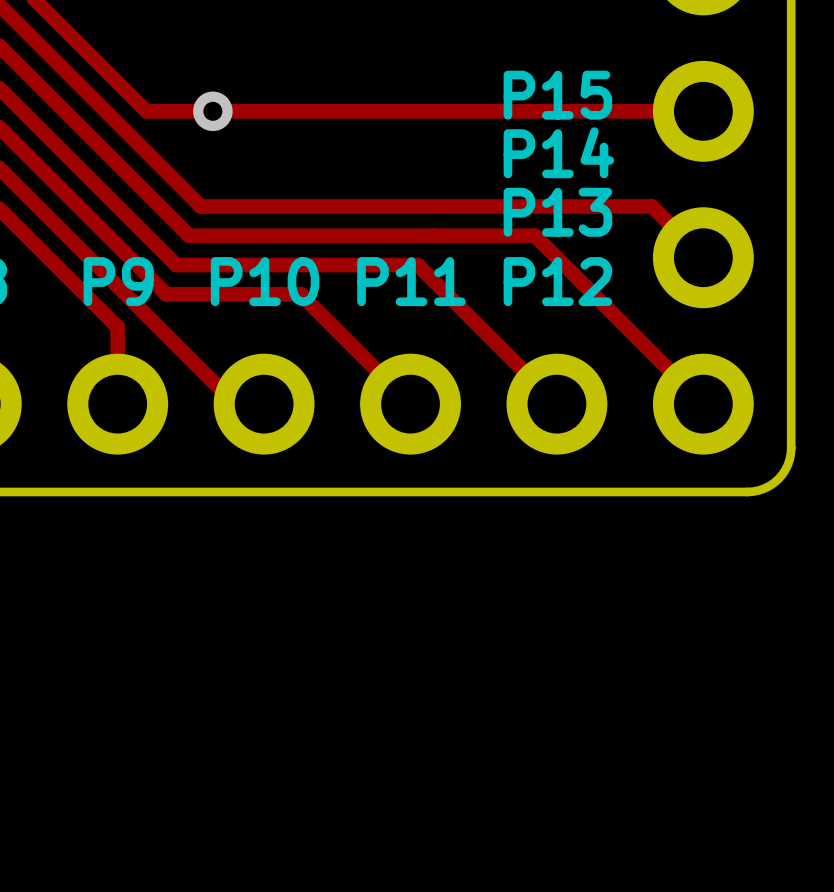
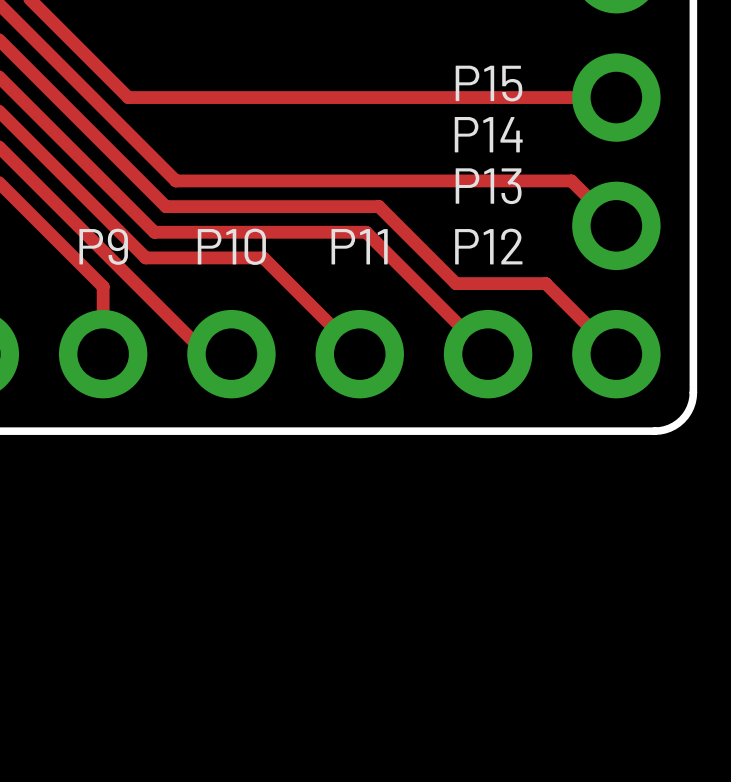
via: (212, 111) -> none
track: (432, 235) (534, 235) (622, 323) -> (379, 206) (455, 283) (545, 283)

